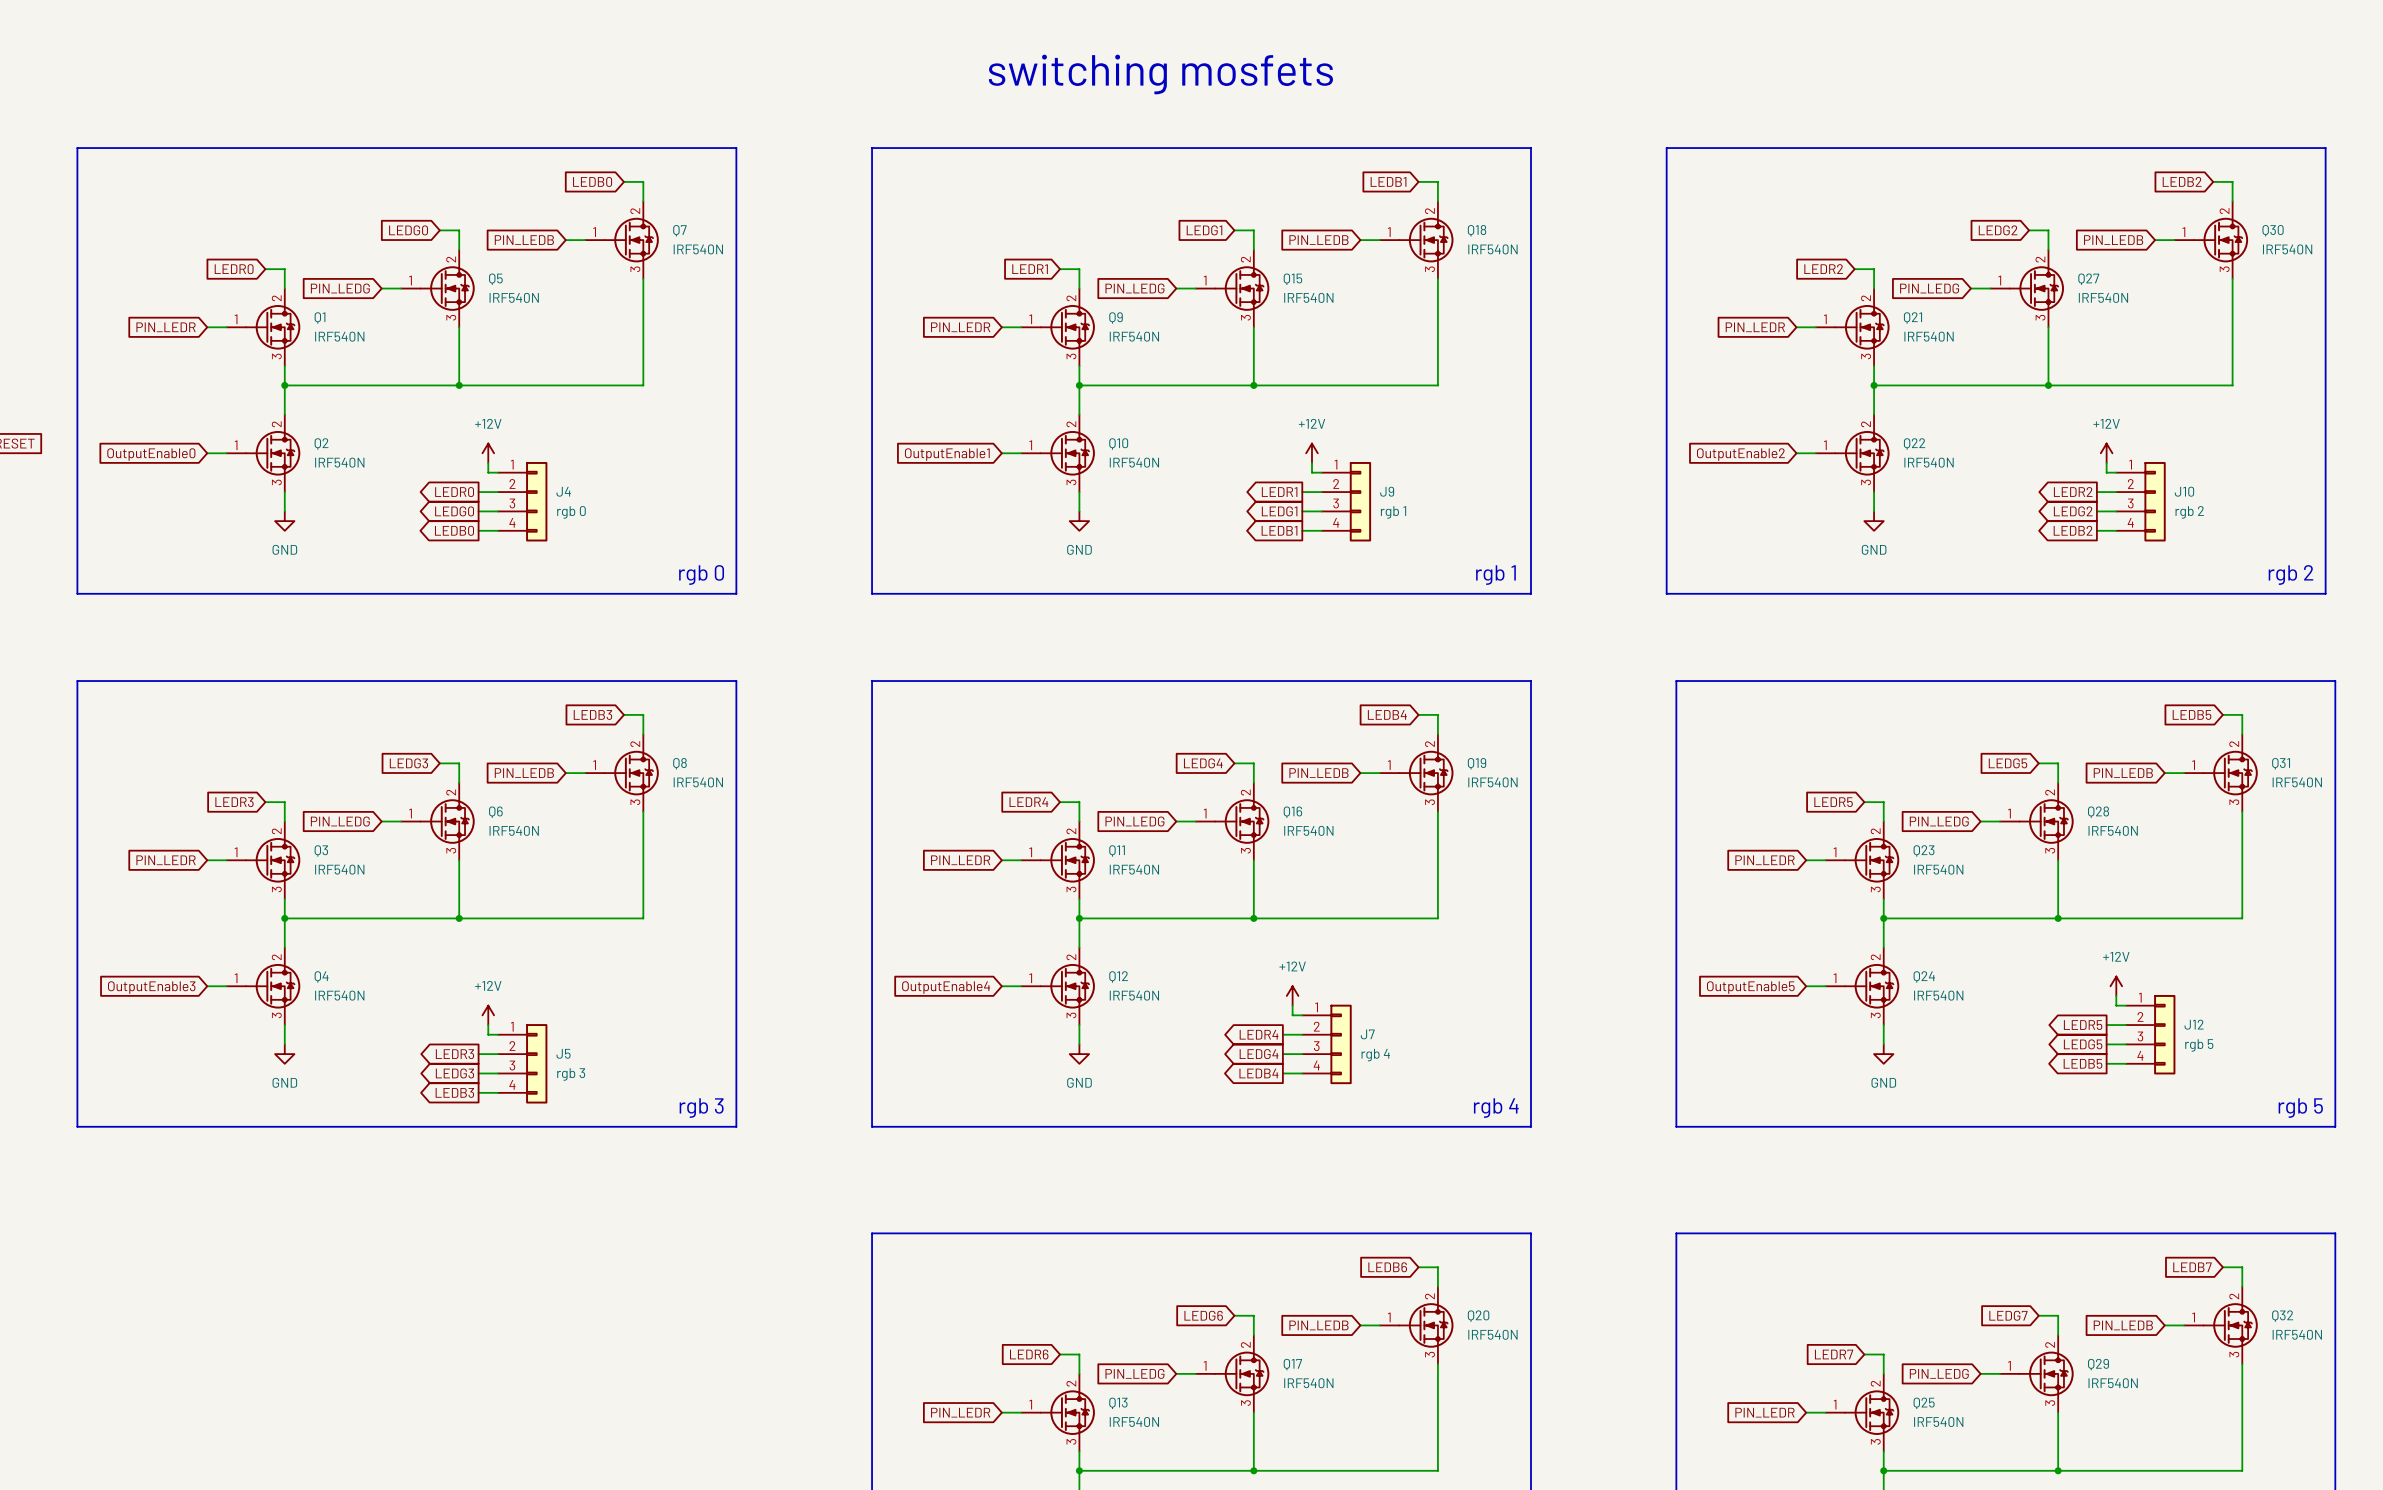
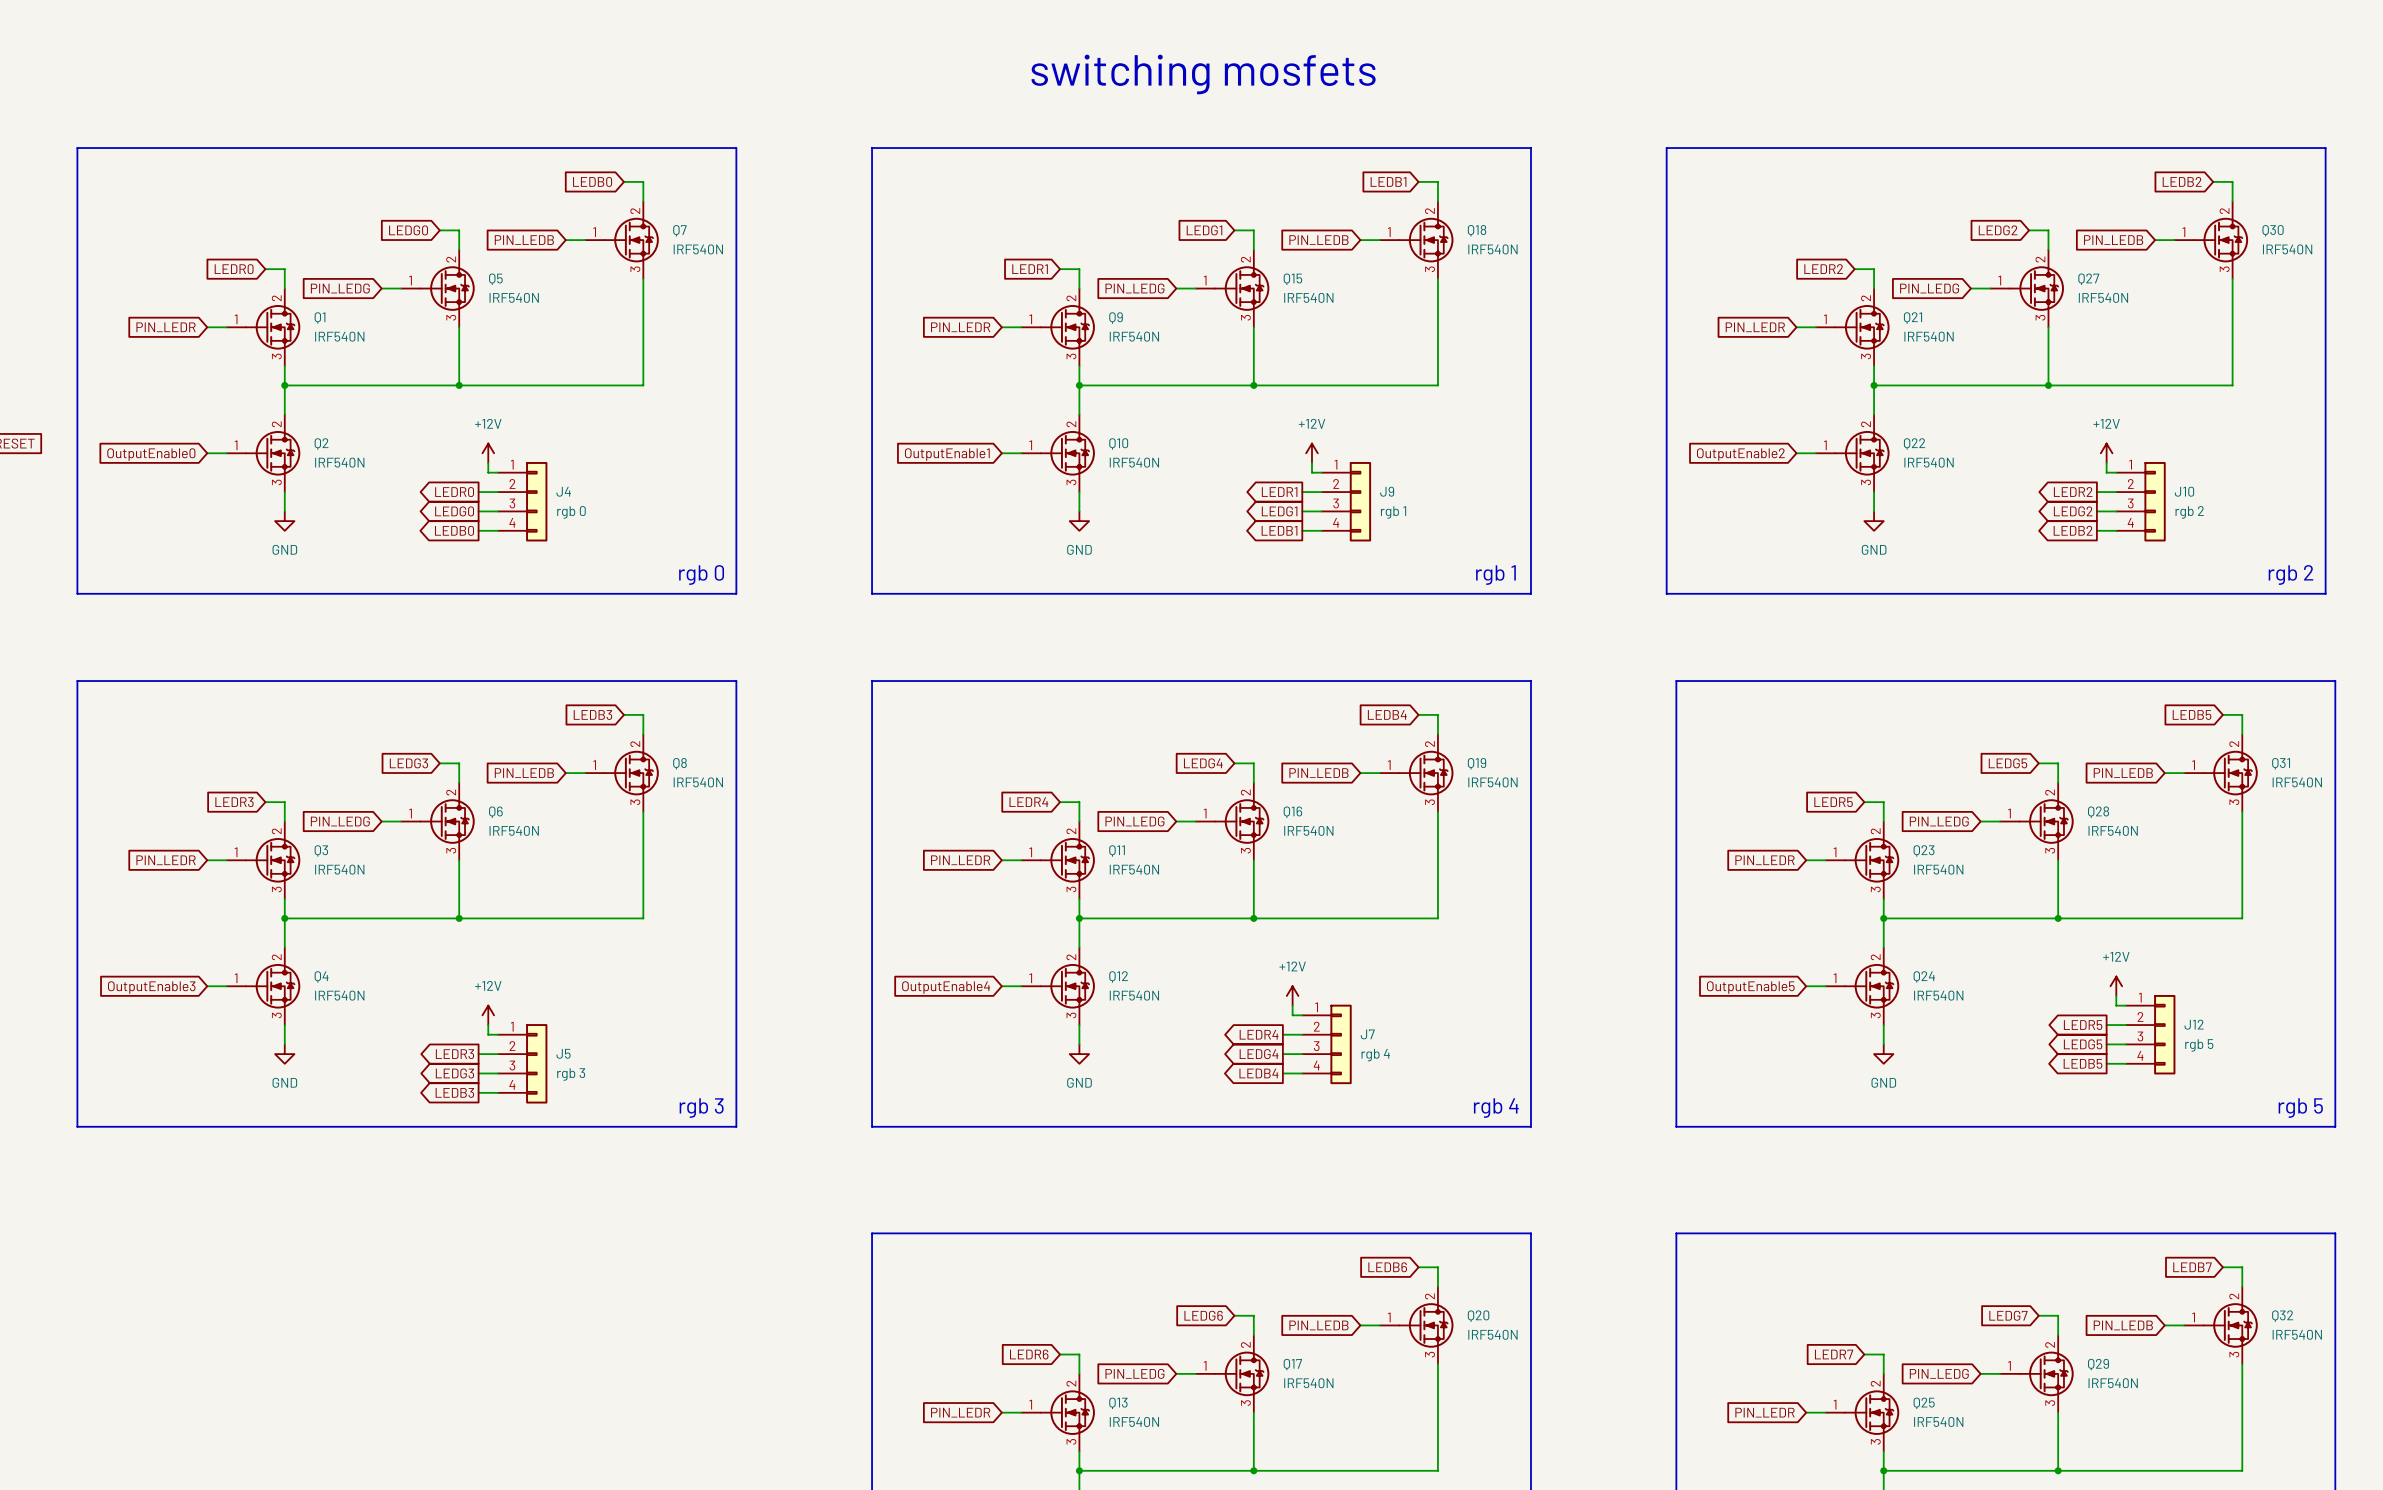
text position: switching mosfets (1160, 74) -> switching mosfets (1203, 74)

